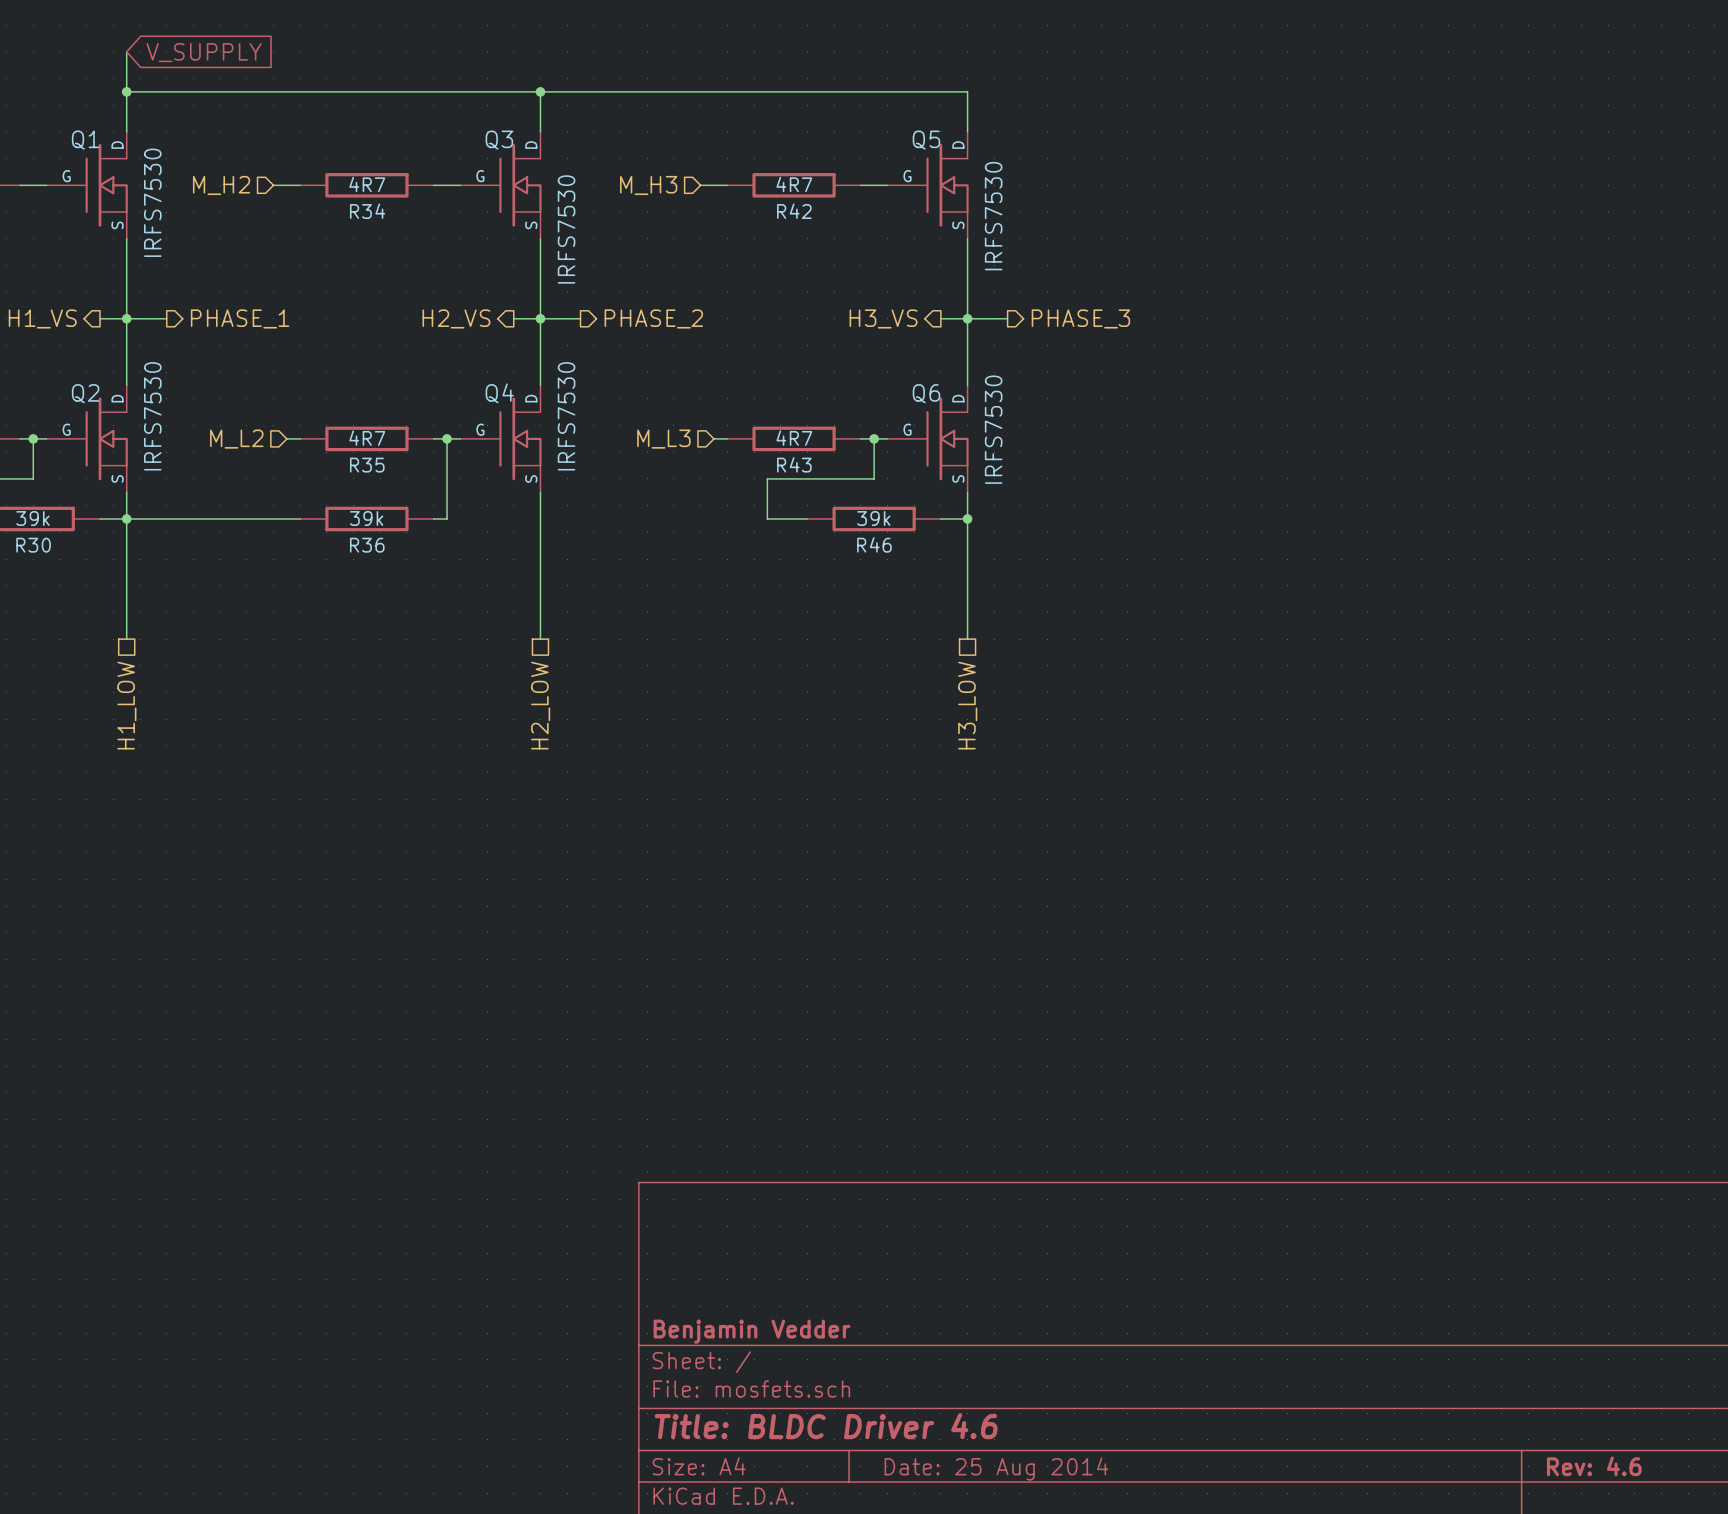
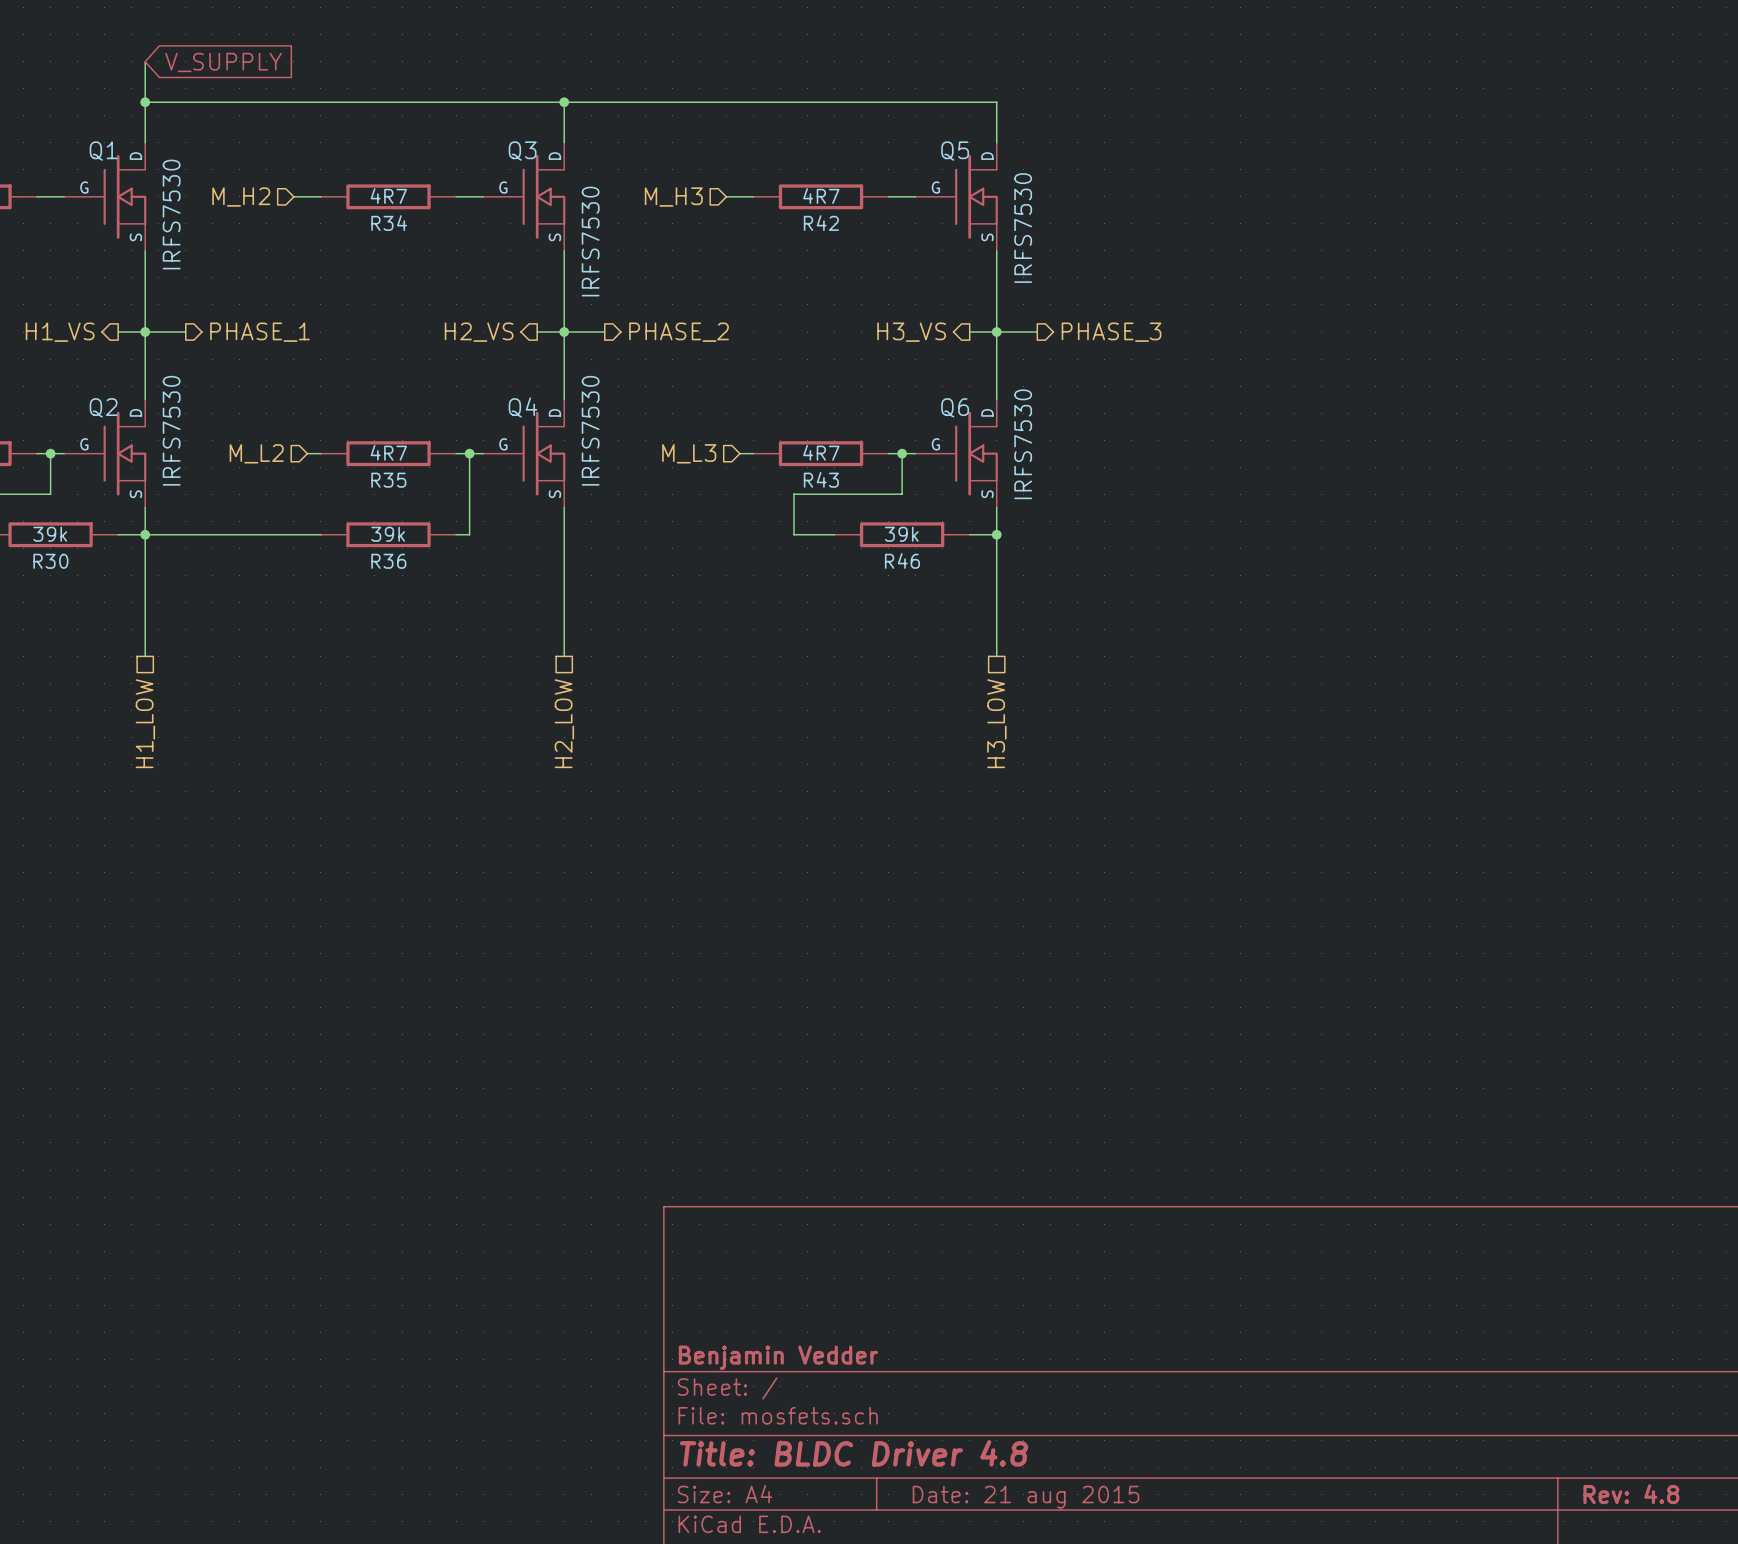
title block: Title: BLDC Driver 4.6 (826, 1426) -> Title: BLDC Driver 4.8 (854, 1453)
title block: Rev: 4.6 (1594, 1466) -> Rev: 4.8 (1631, 1494)
title block: Date: 25 Aug 2014 (996, 1468) -> Date: 21 aug 2015 (1026, 1497)

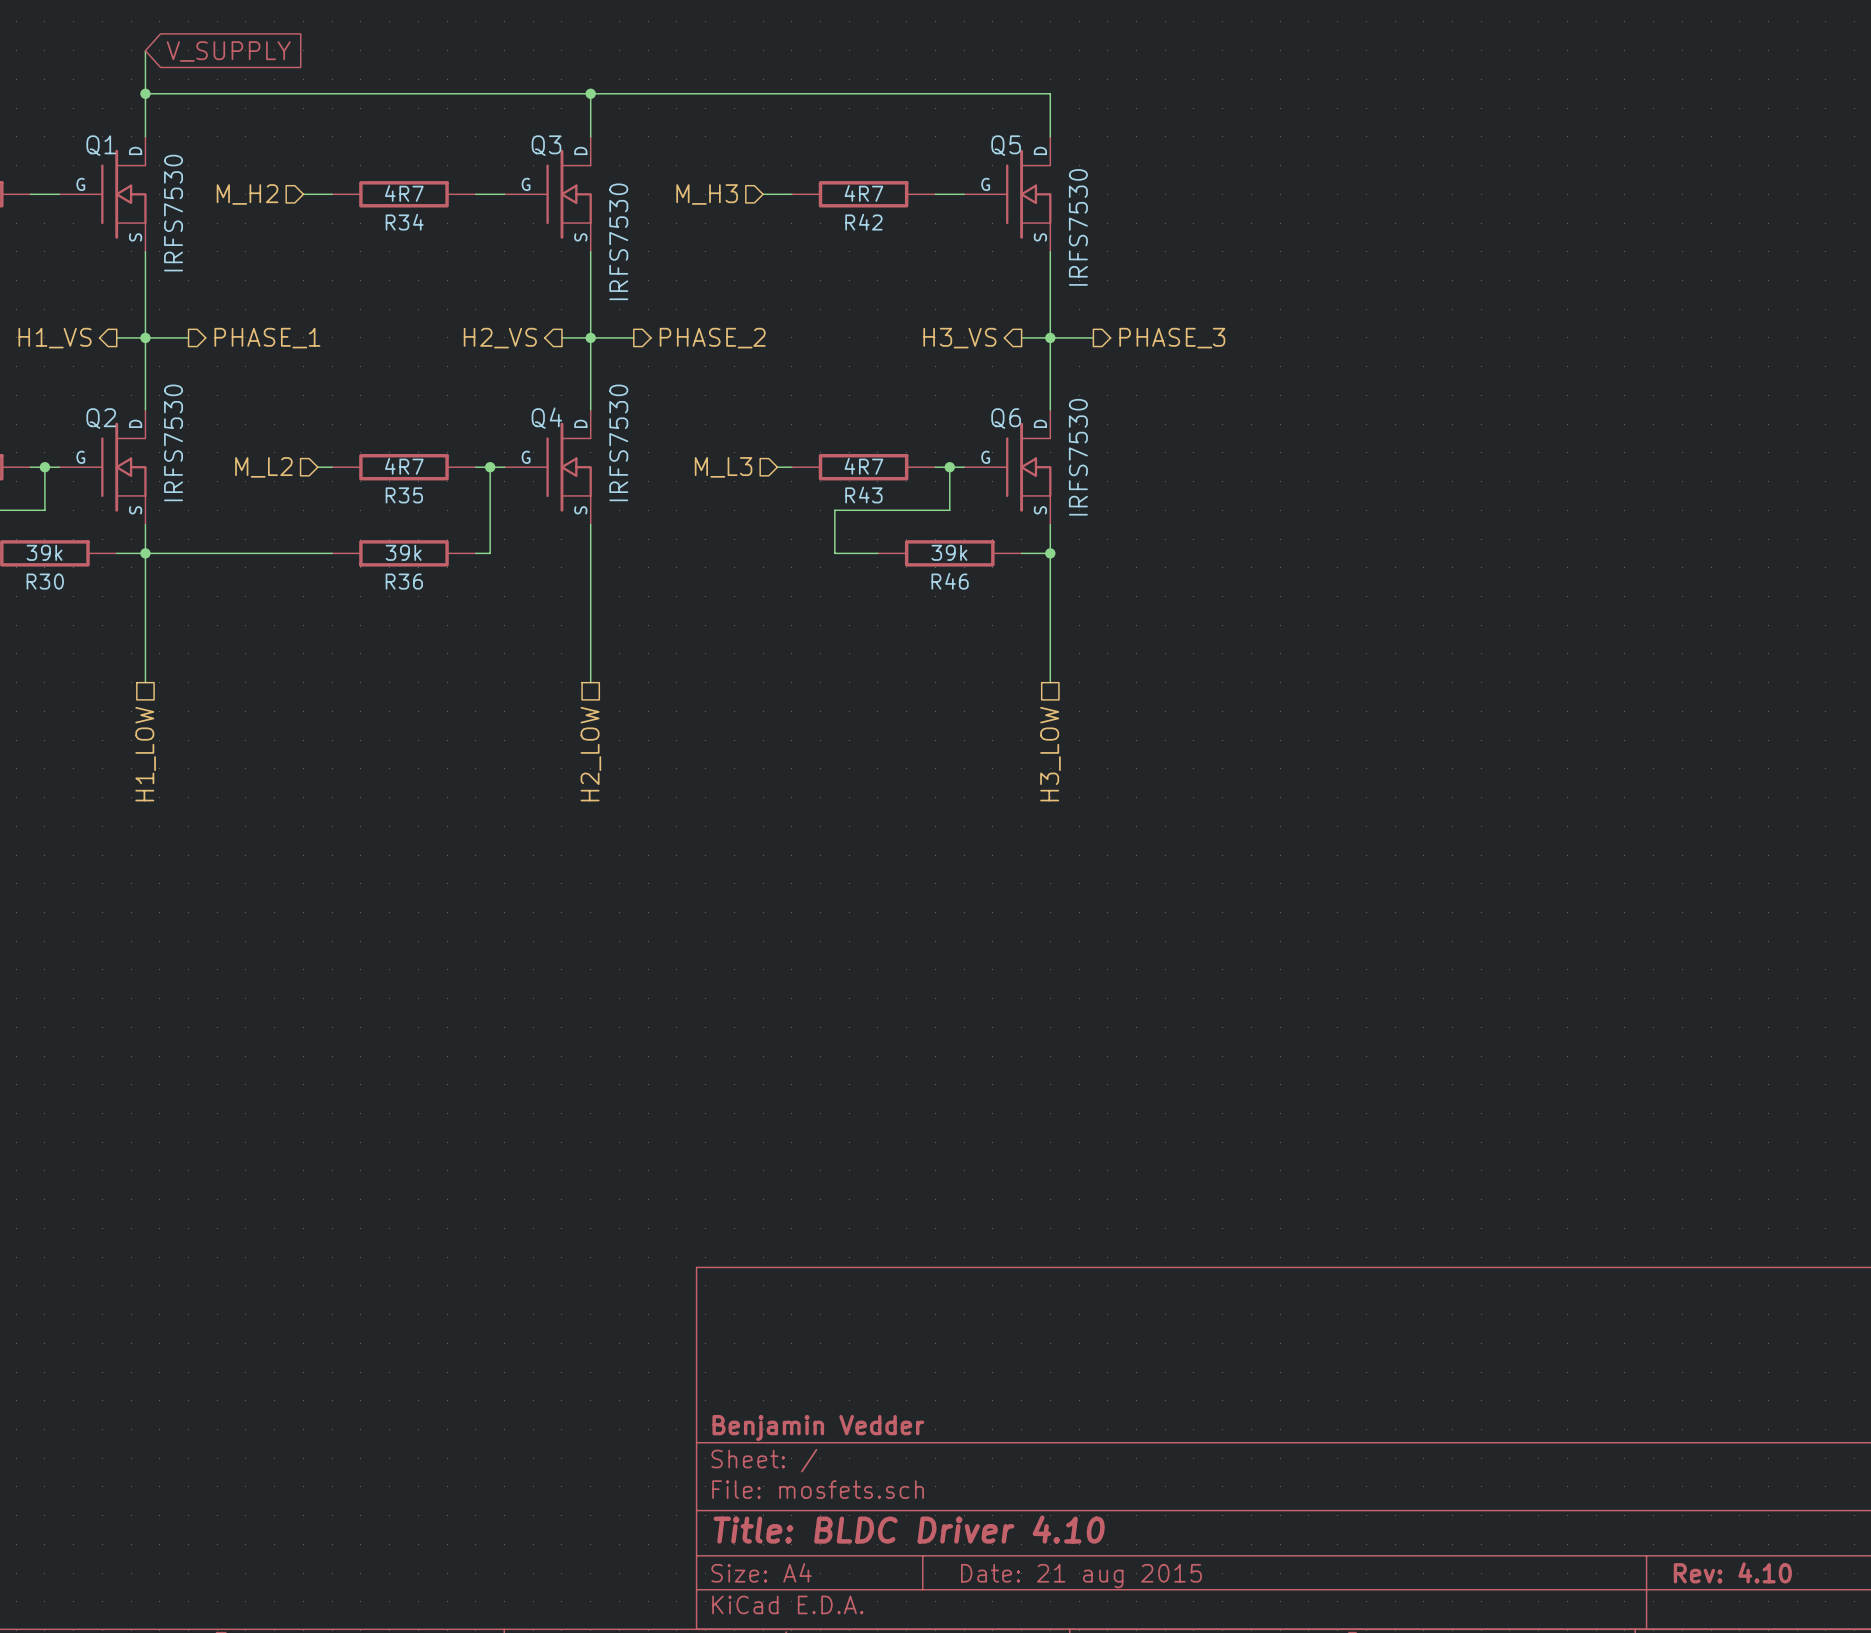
title block: Title: BLDC Driver 4.8 (854, 1453) -> Title: BLDC Driver 4.10 (909, 1529)
title block: Rev: 4.8 (1631, 1494) -> Rev: 4.10 (1732, 1572)

